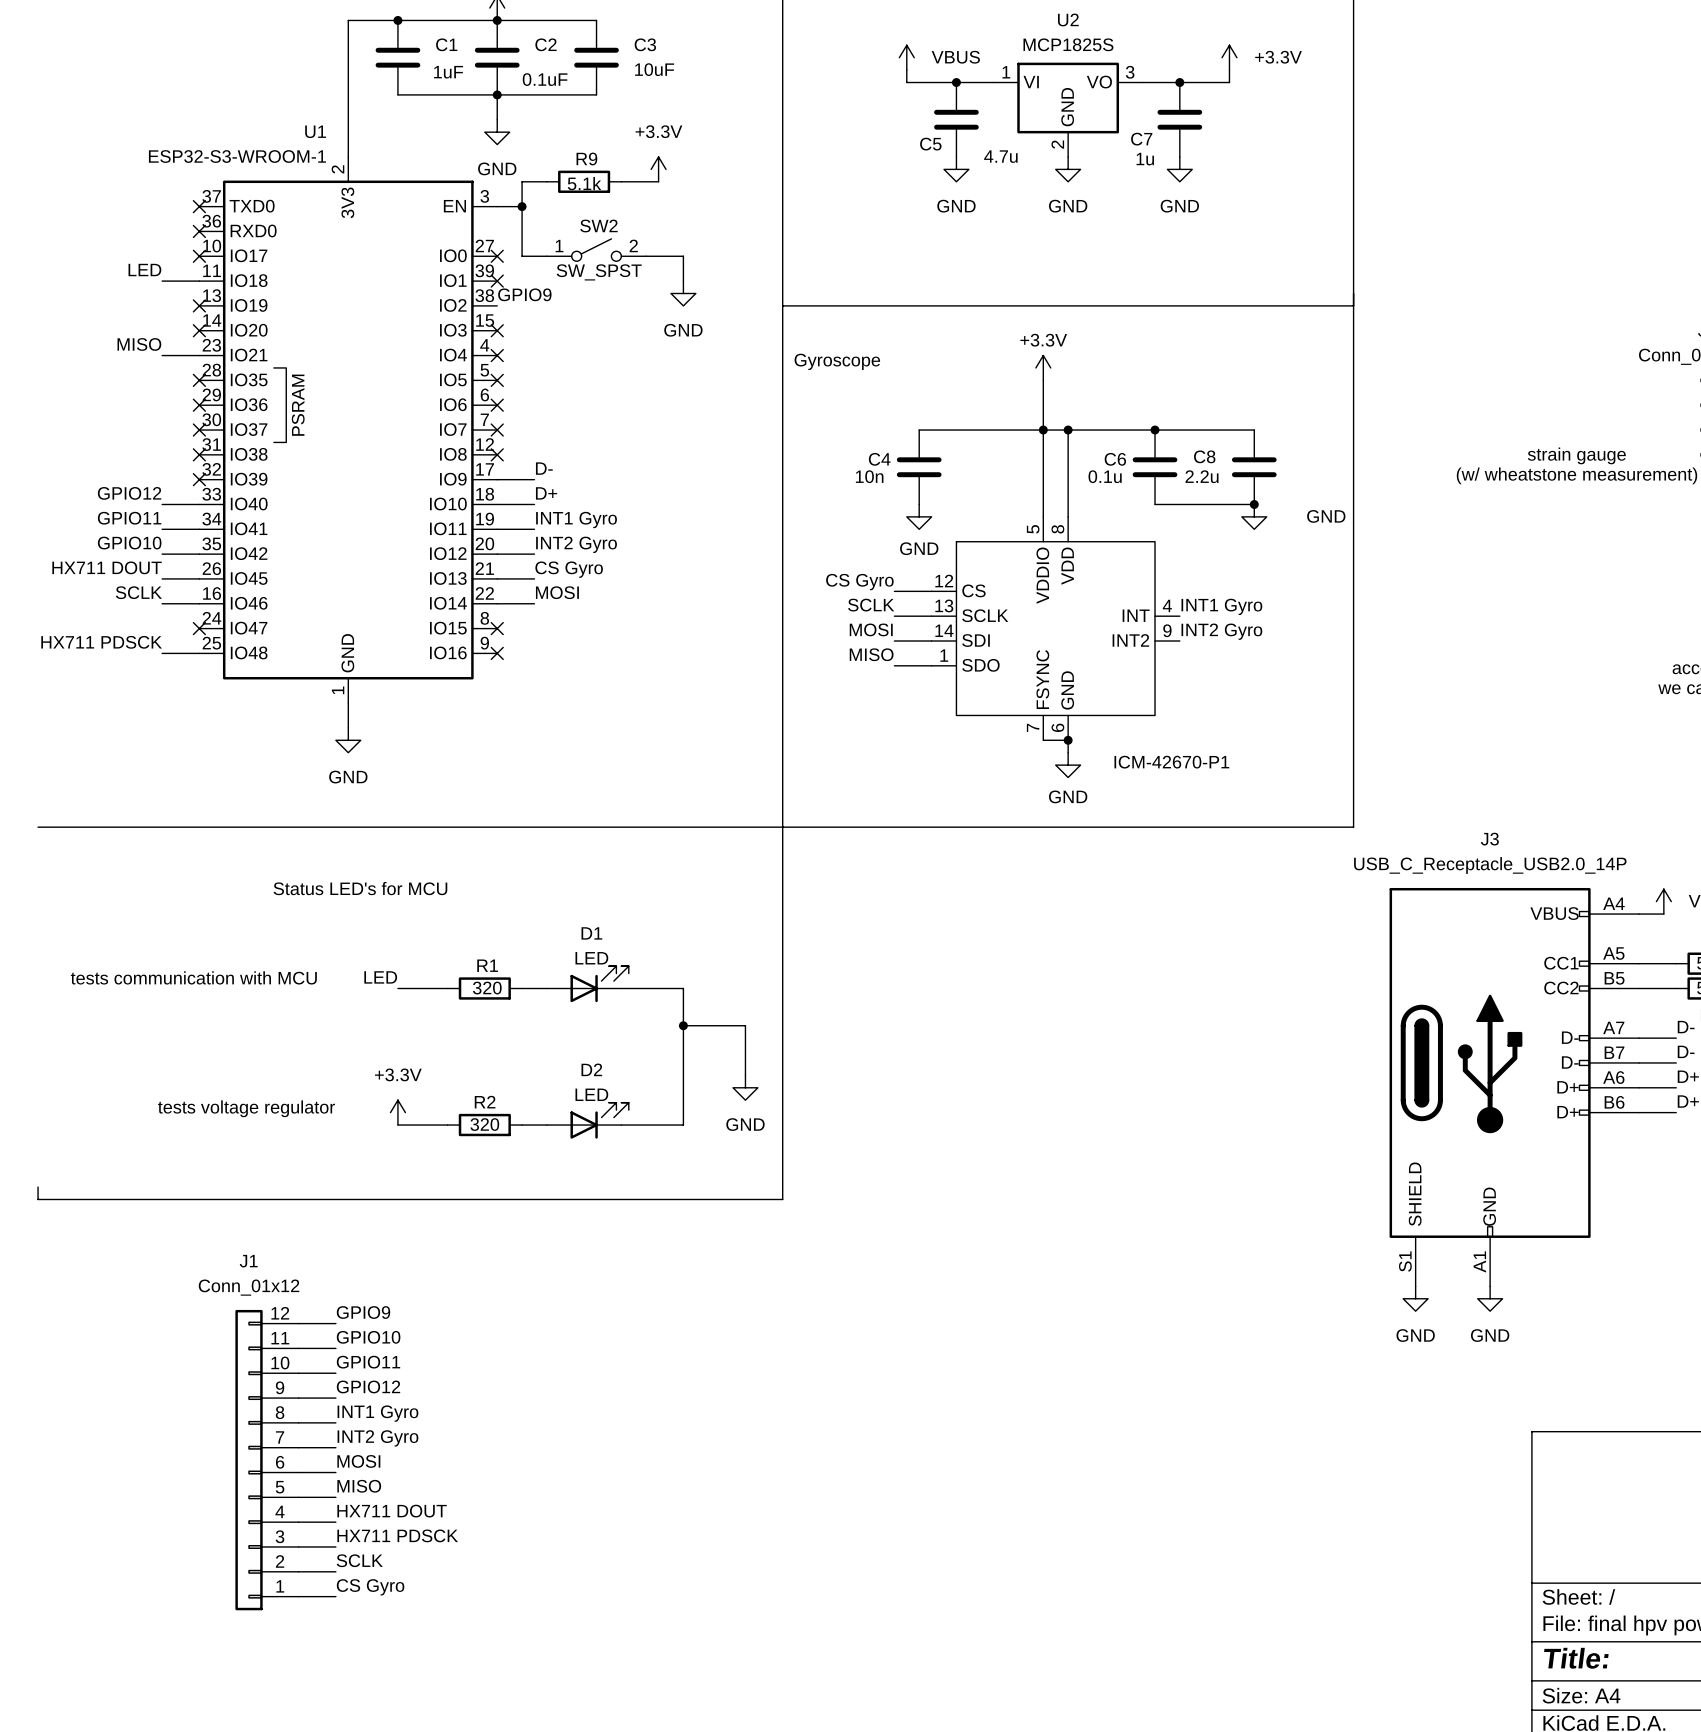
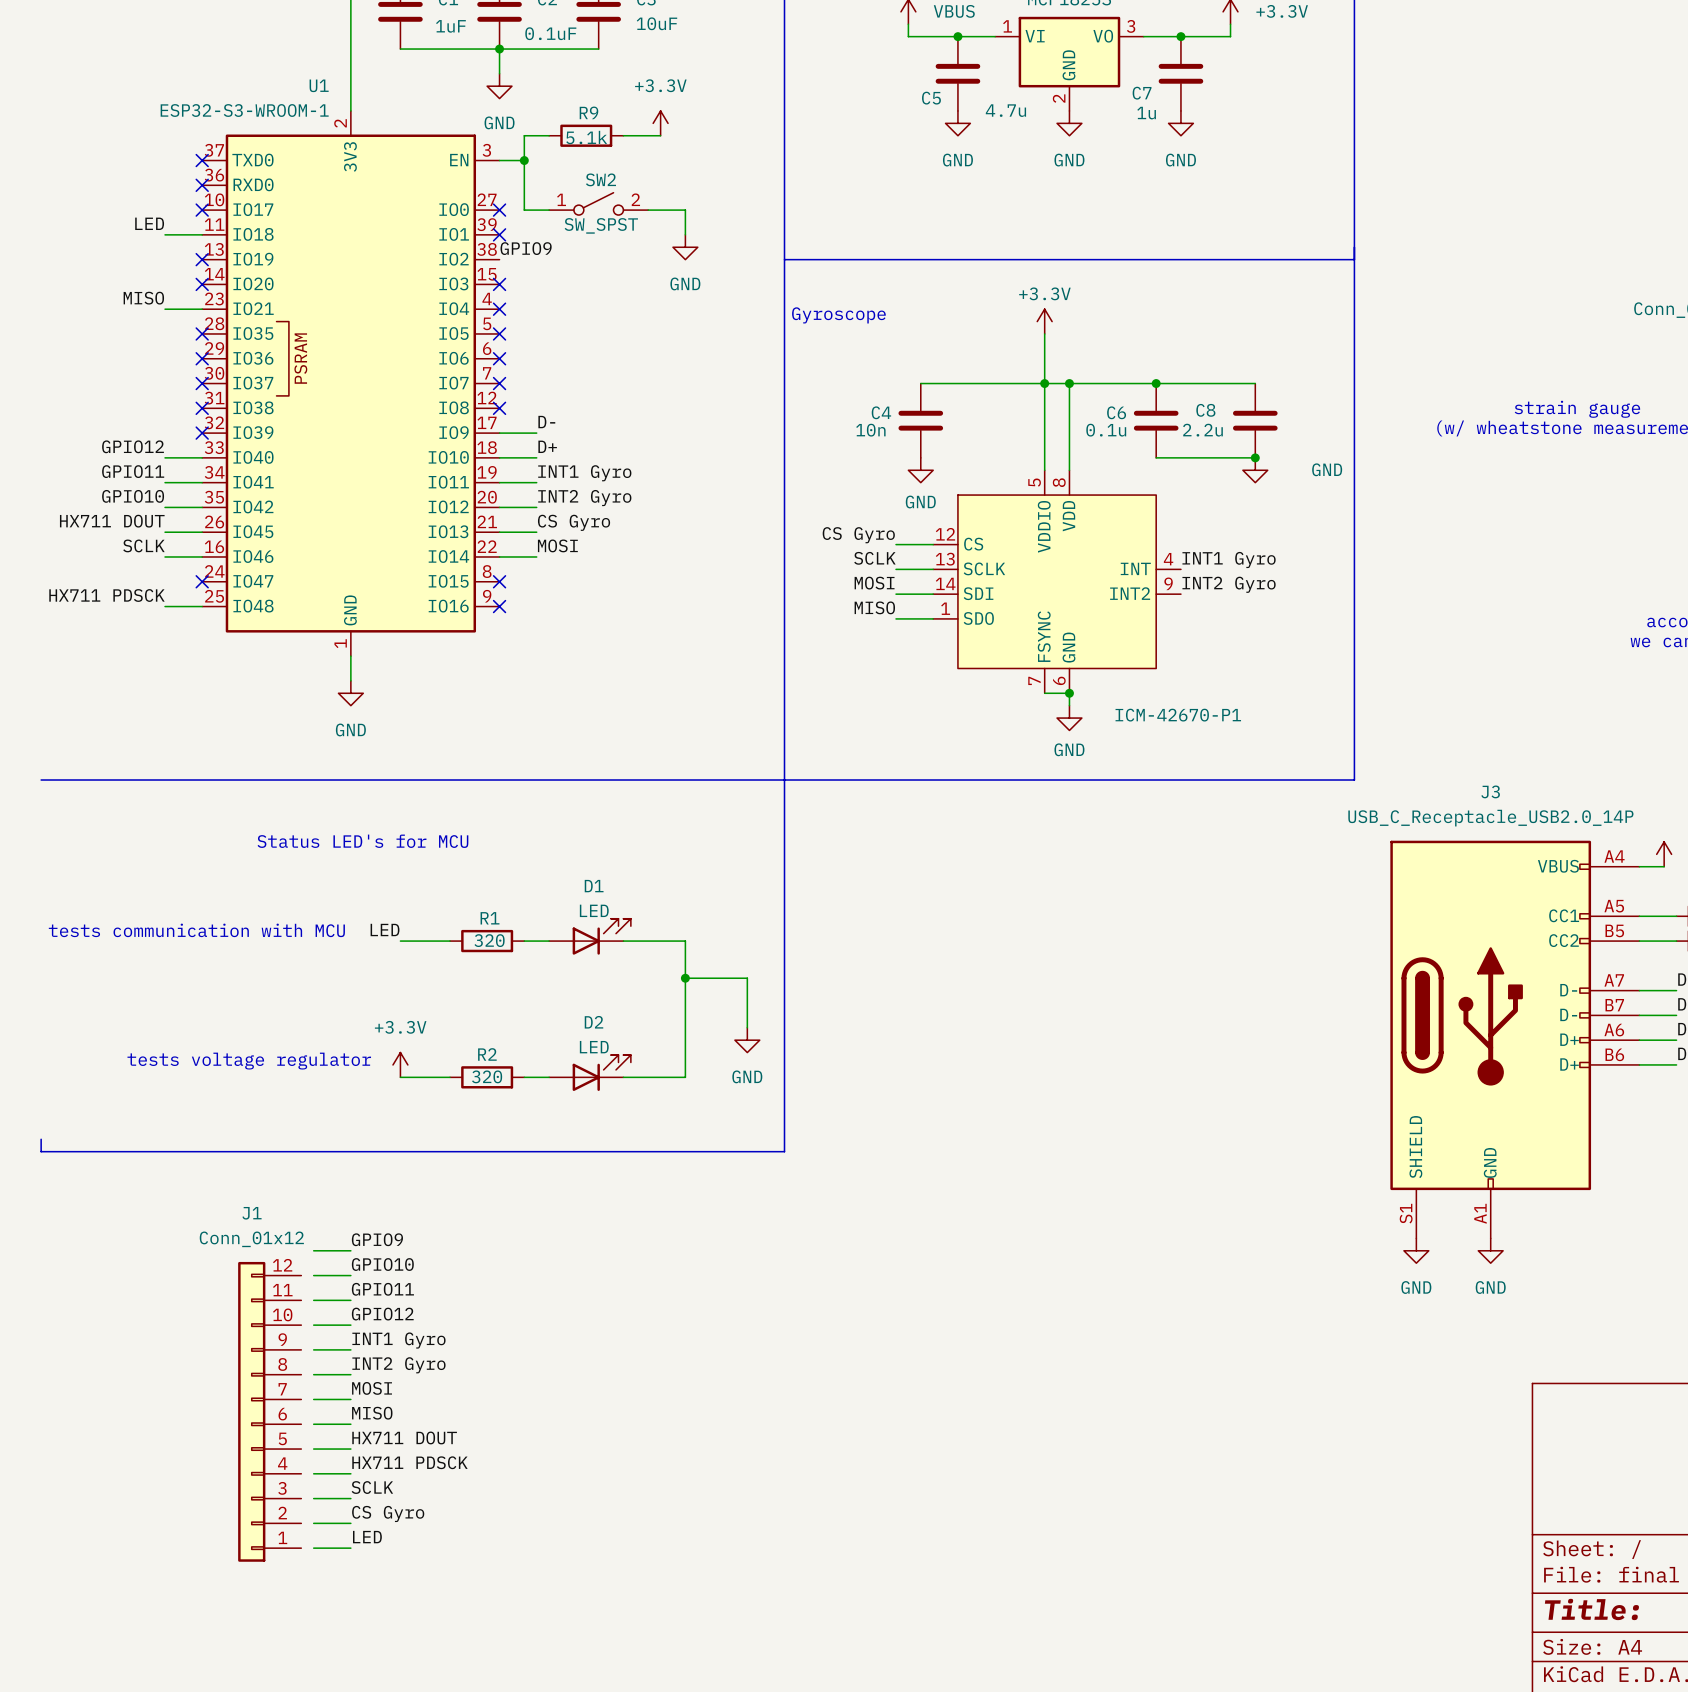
wire: none -> (313, 1250) (350, 1250)
label position: GPIO9 (363, 1312) -> GPIO9 (377, 1239)
wire: (298, 1323) (311, 1323) -> (338, 1275) (350, 1275)
label position: GPIO10 (368, 1337) -> GPIO10 (382, 1264)
wire: (298, 1348) (311, 1348) -> (338, 1300) (350, 1300)
label position: GPIO11 (368, 1362) -> GPIO11 (382, 1289)
wire: (298, 1373) (311, 1373) -> (338, 1325) (350, 1325)
label position: GPIO12 (368, 1386) -> GPIO12 (382, 1314)
wire: (298, 1398) (311, 1398) -> (338, 1349) (350, 1349)
label position: INT1 Gyro (377, 1413) -> INT1 Gyro (398, 1340)
wire: (298, 1422) (311, 1422) -> (338, 1374) (350, 1374)
label position: INT2 Gyro (377, 1438) -> INT2 Gyro (398, 1365)
wire: (298, 1447) (311, 1447) -> (338, 1399) (350, 1399)
label position: MOSI (358, 1461) -> MOSI (372, 1388)
wire: (298, 1472) (311, 1472) -> (338, 1424) (350, 1424)
label position: MISO (359, 1486) -> MISO (372, 1413)
wire: (298, 1497) (311, 1497) -> (338, 1449) (350, 1449)
label position: HX711 DOUT (392, 1511) -> HX711 DOUT (404, 1437)
wire: (298, 1522) (311, 1522) -> (338, 1473) (350, 1473)
label position: HX711 PDSCK (397, 1535) -> HX711 PDSCK (409, 1462)
wire: (298, 1546) (311, 1546) -> (338, 1498) (350, 1498)
label position: SCLK (359, 1560) -> SCLK (372, 1487)
wire: (298, 1571) (311, 1571) -> (338, 1523) (350, 1523)
label: none -> LED (367, 1537)
label position: CS Gyro (370, 1587) -> CS Gyro (388, 1513)
wire: (298, 1596) (311, 1596) -> (338, 1548) (350, 1548)

